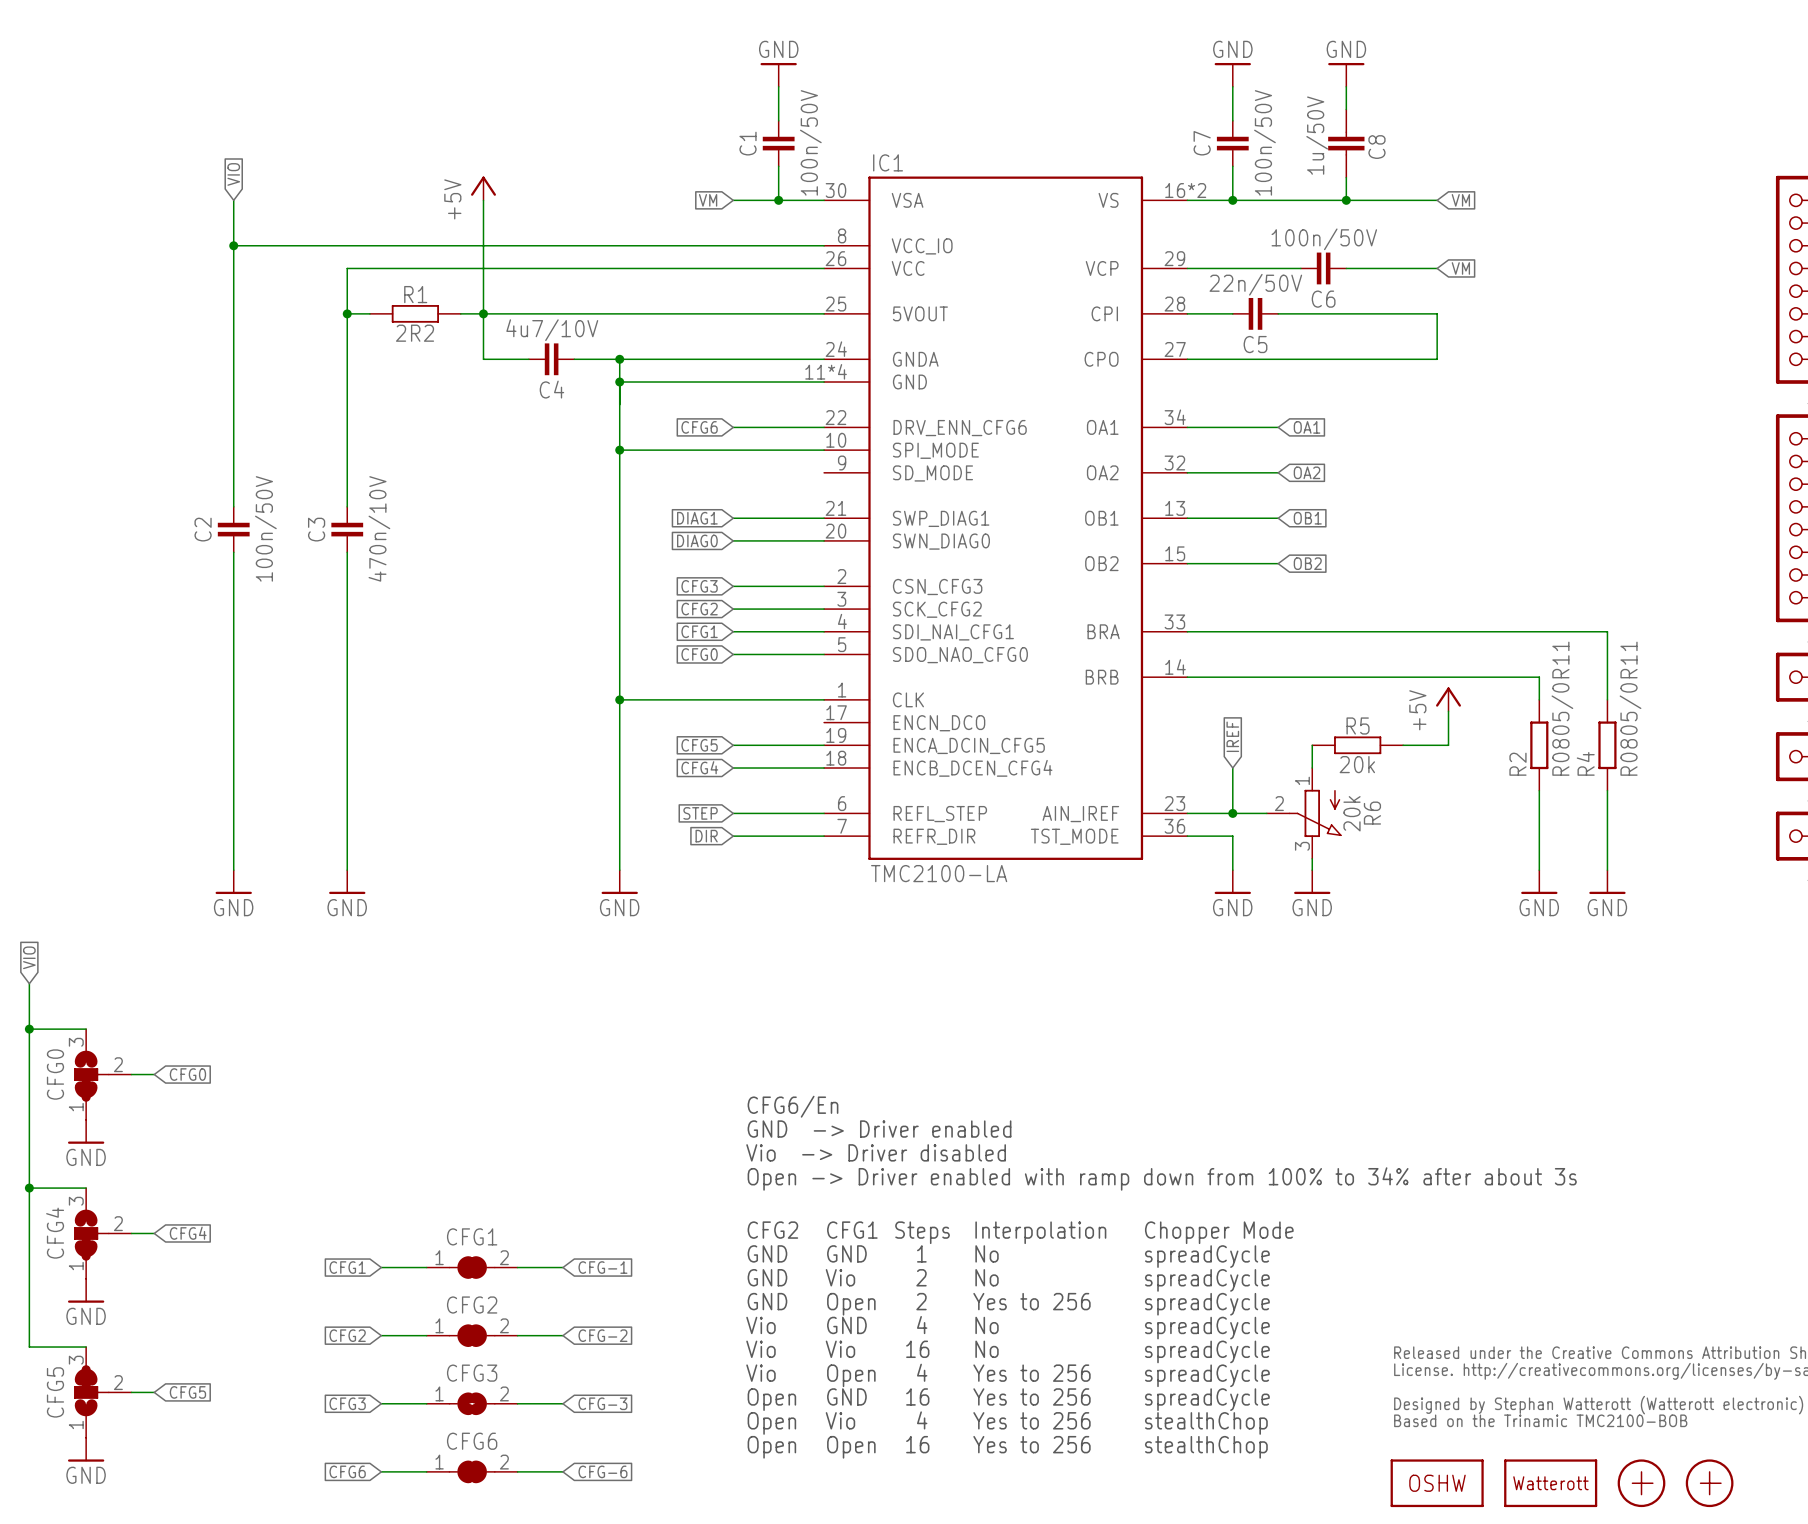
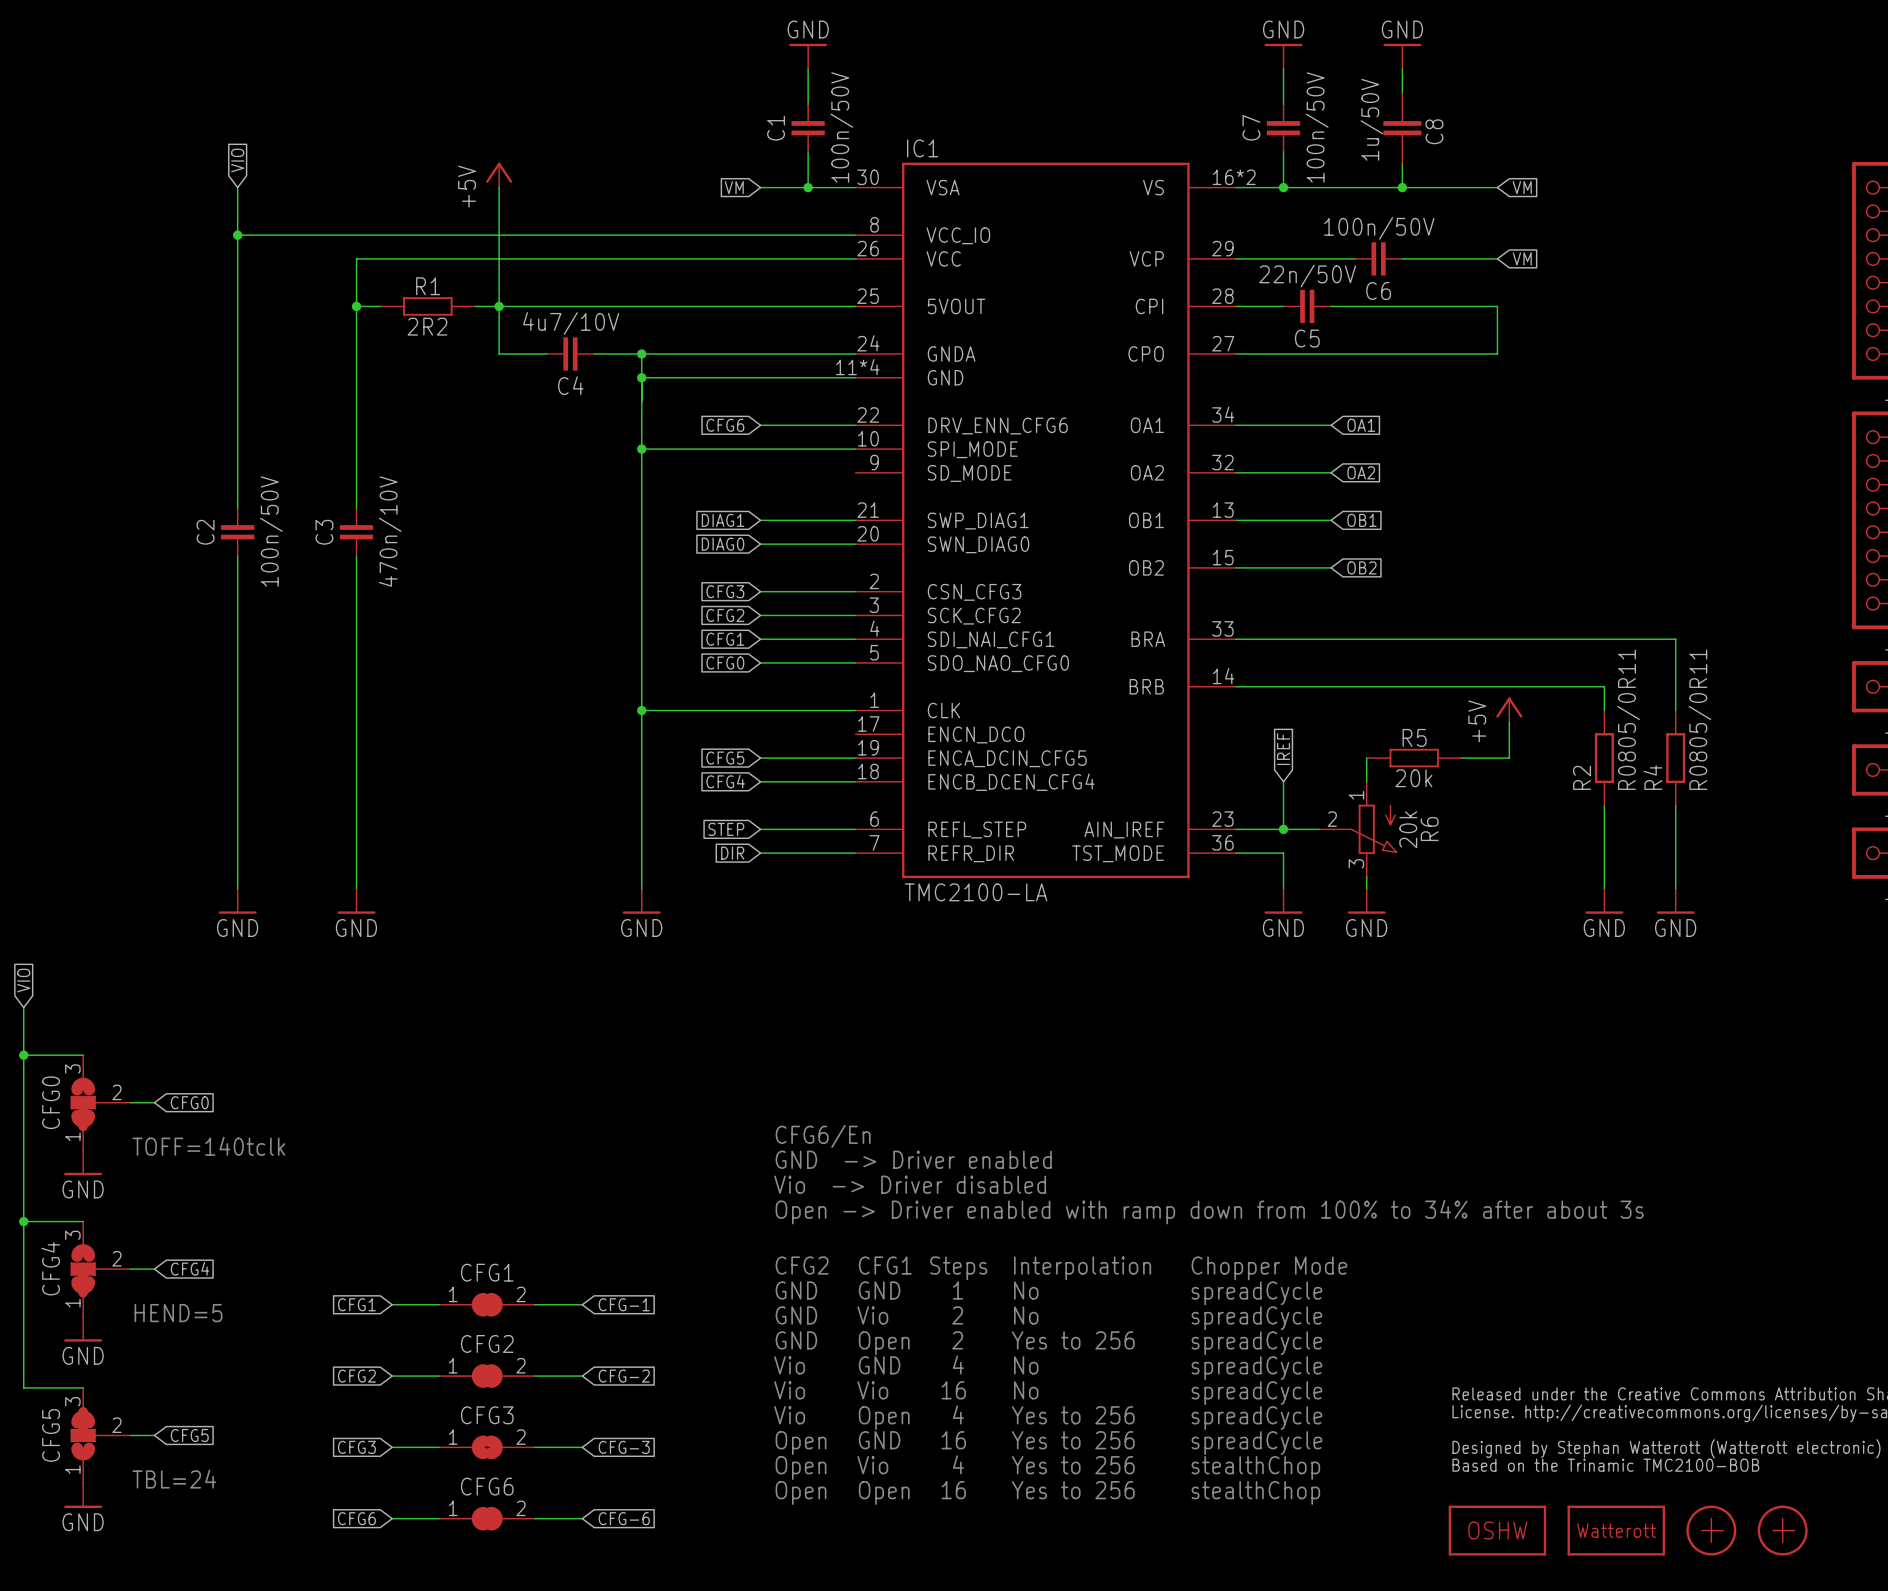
text: none -> TOFF=140tclk (208, 1146)
text: none -> HEND=5 (178, 1313)
text: none -> TBL=24 (174, 1479)

